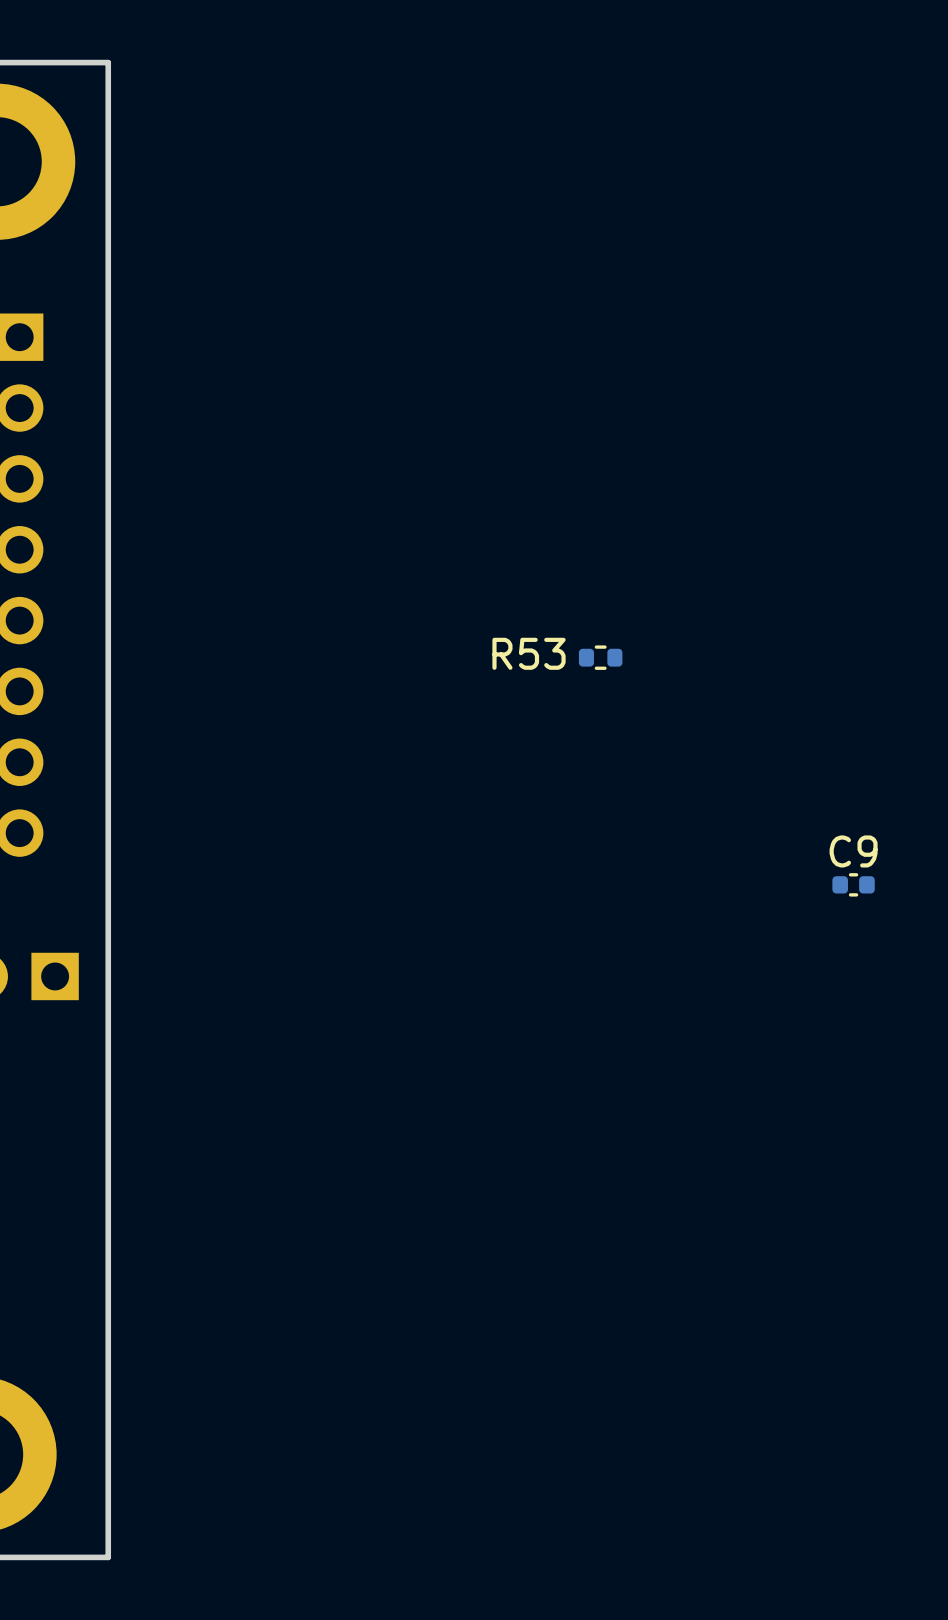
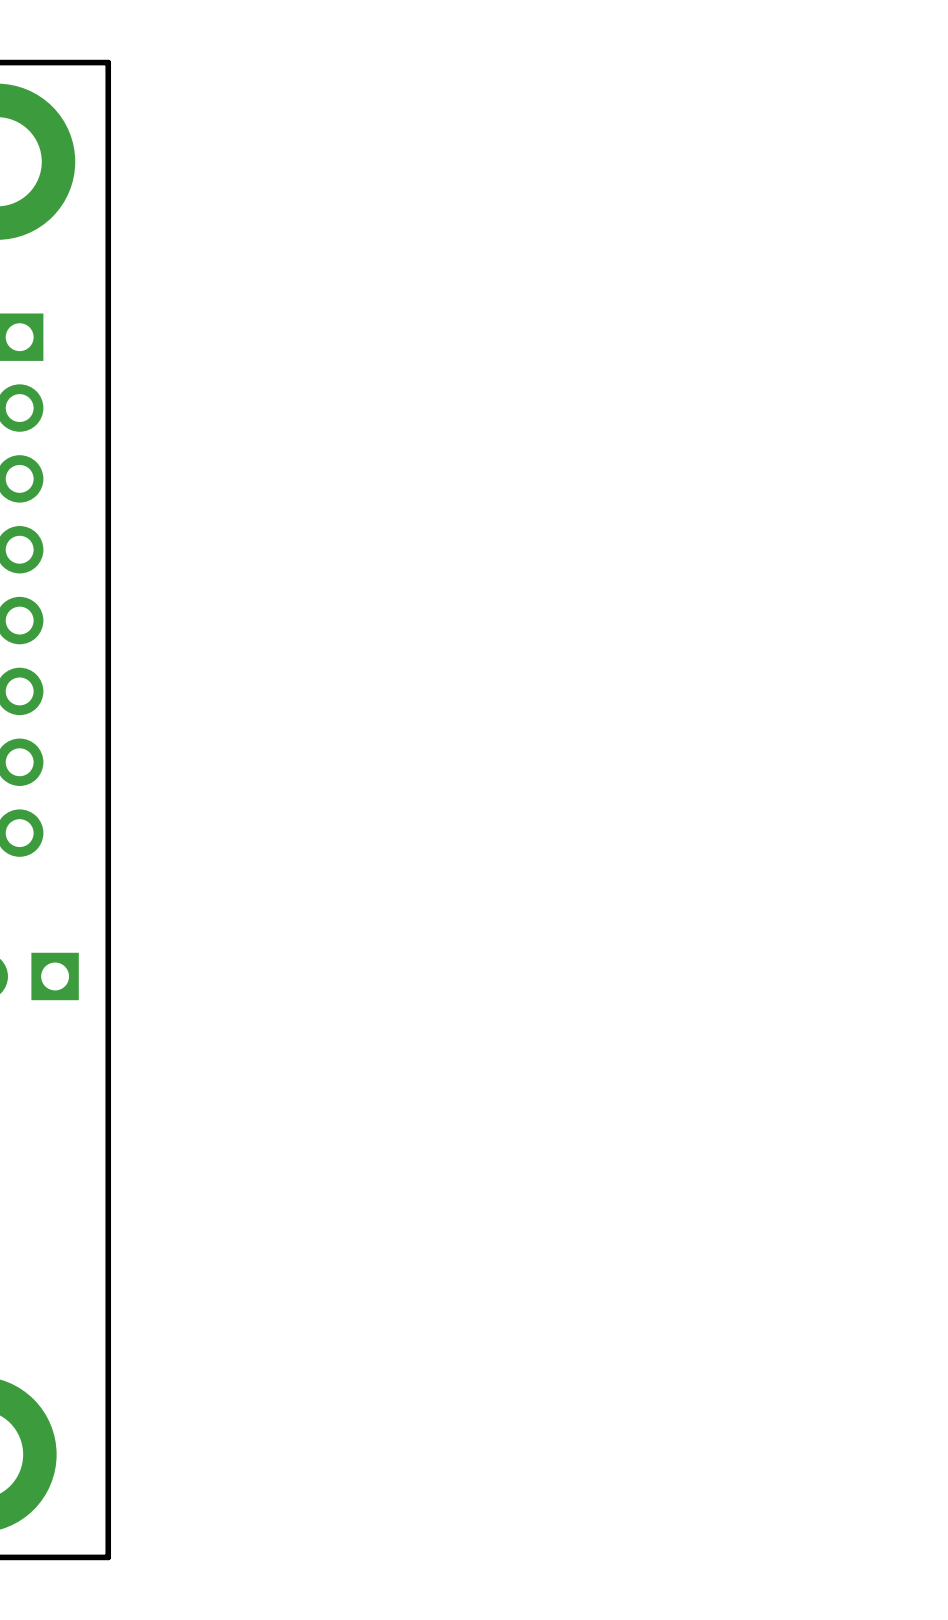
R53: (600, 657) -> none
C9: (853, 884) -> none

